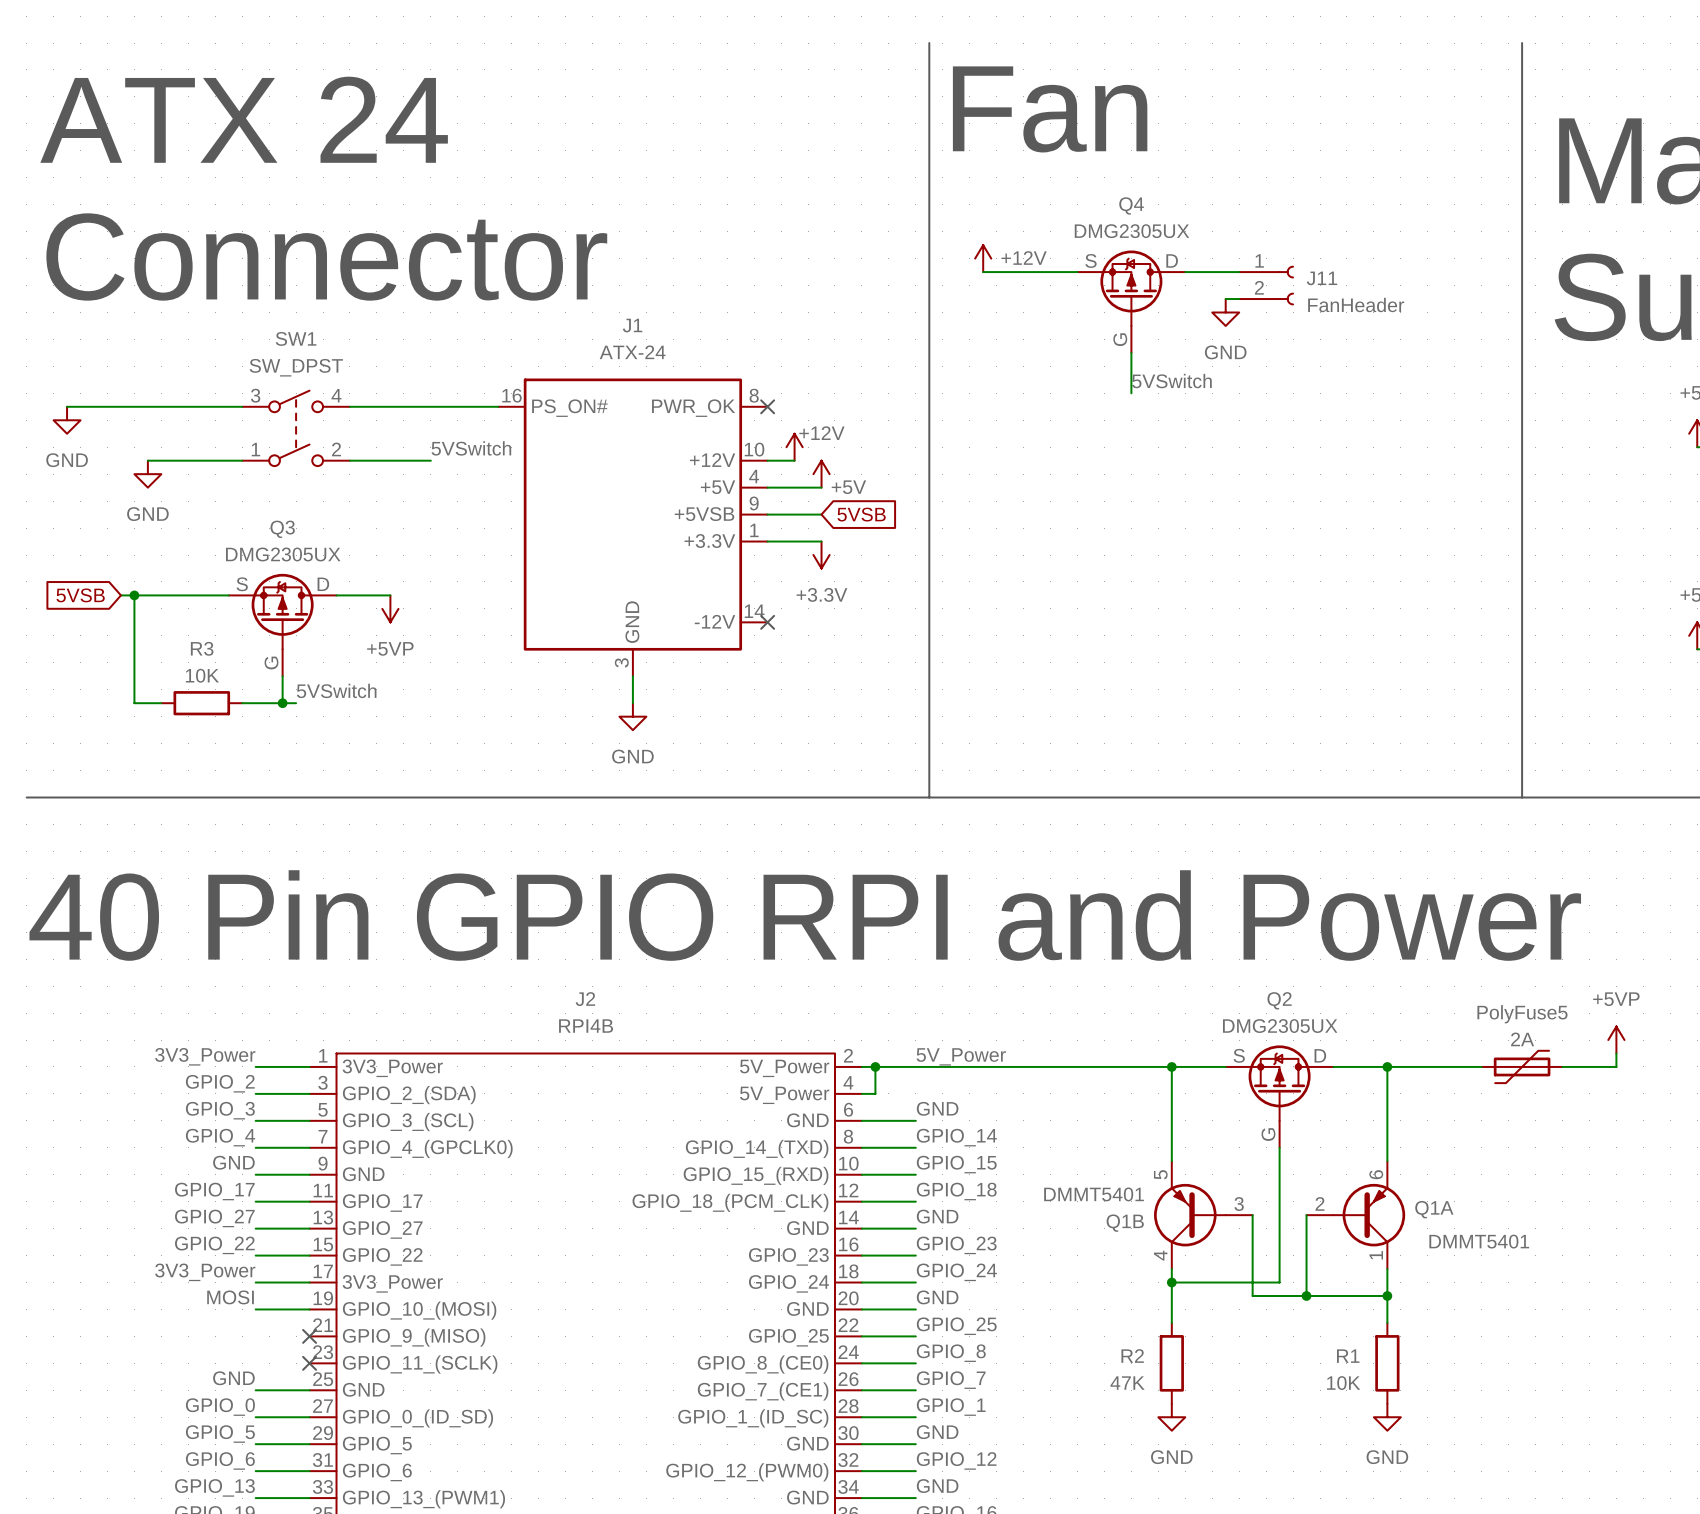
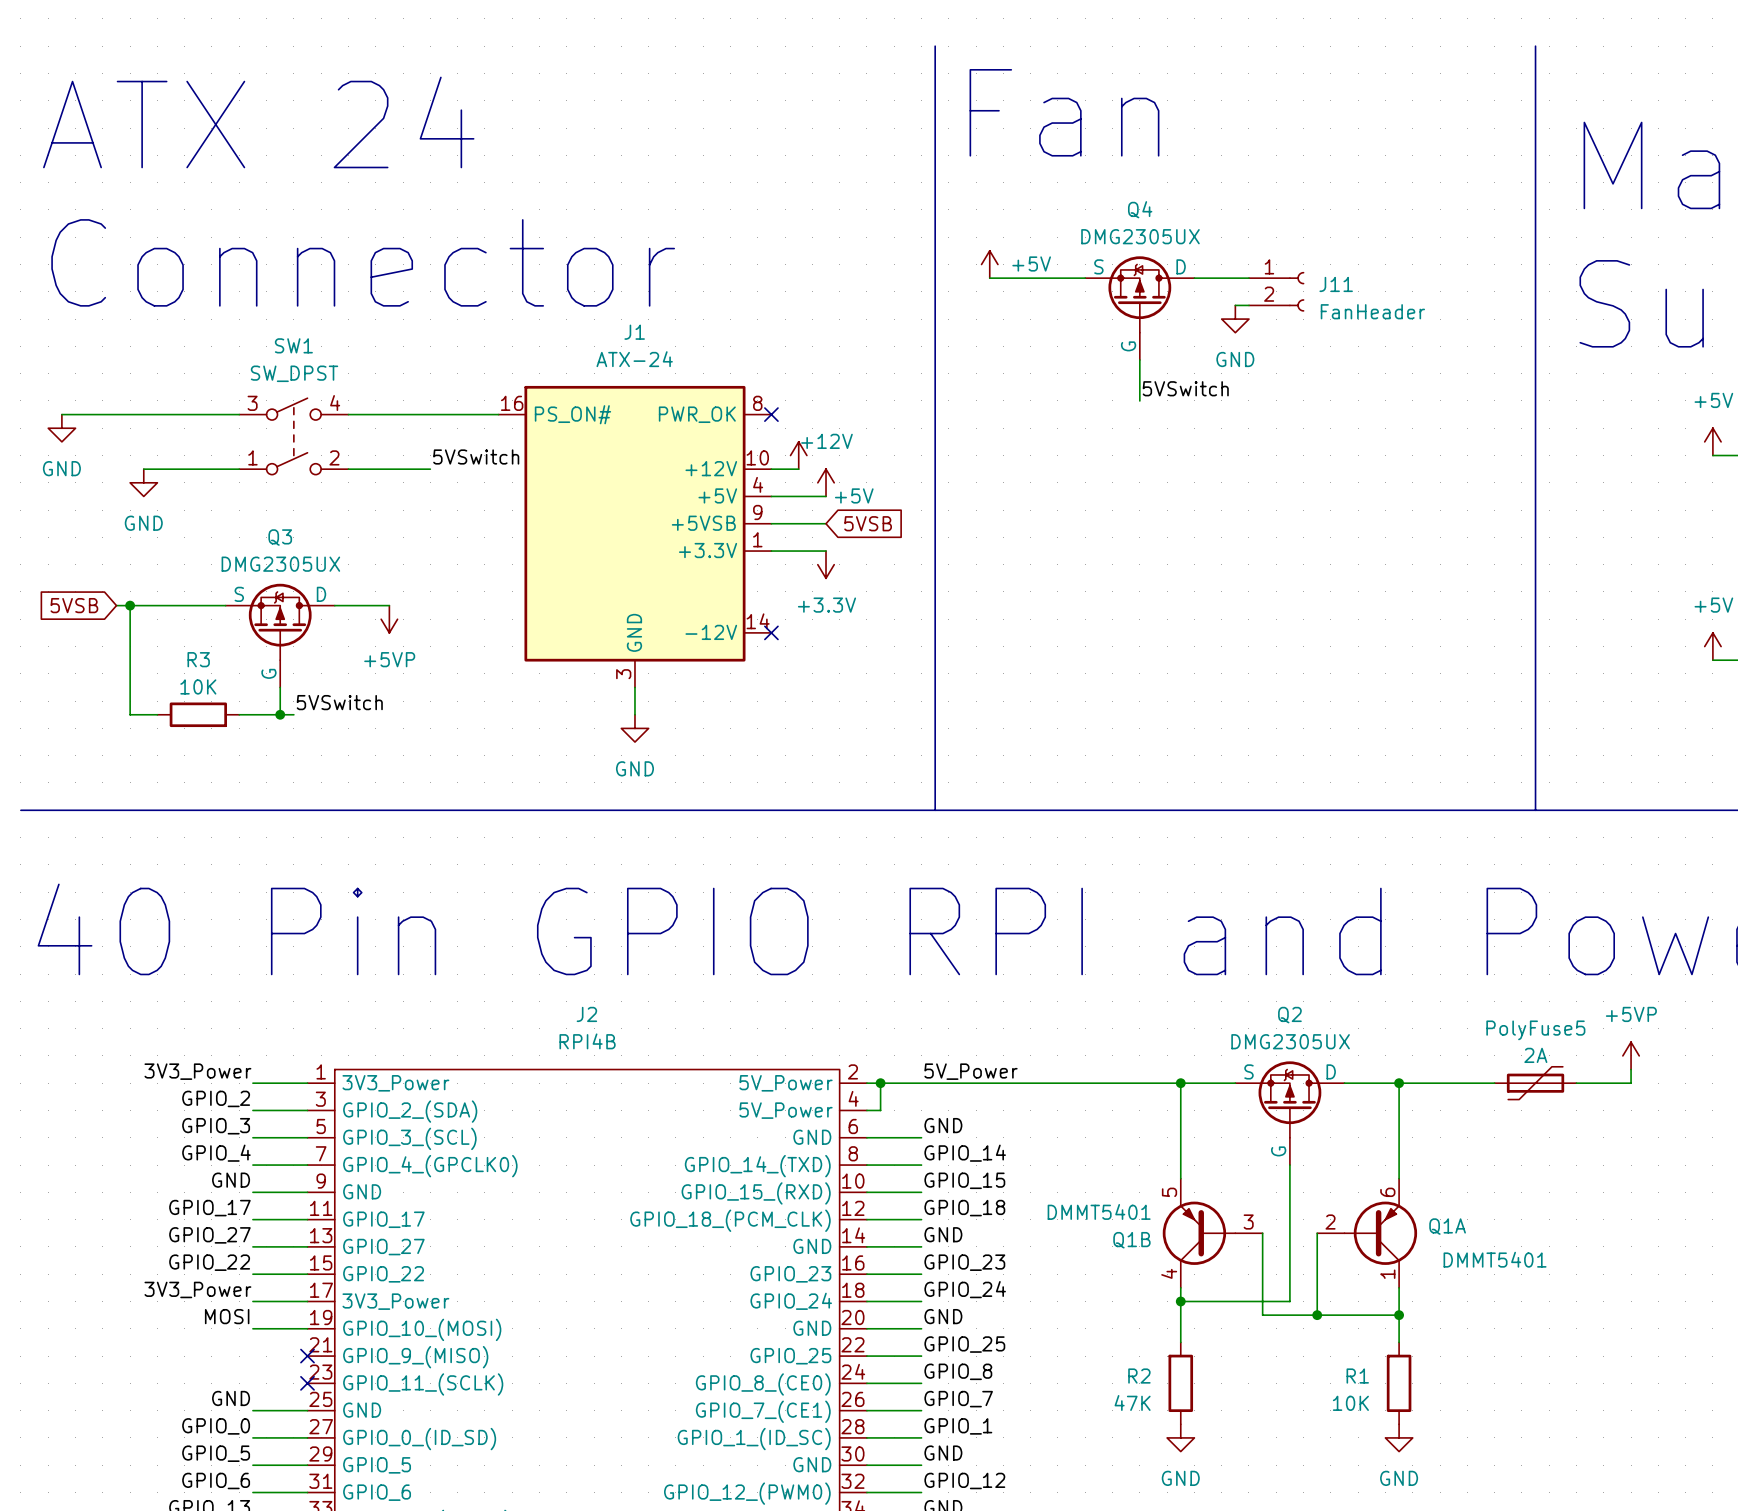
power symbol: +12V (983, 258) -> +5V (989, 264)

